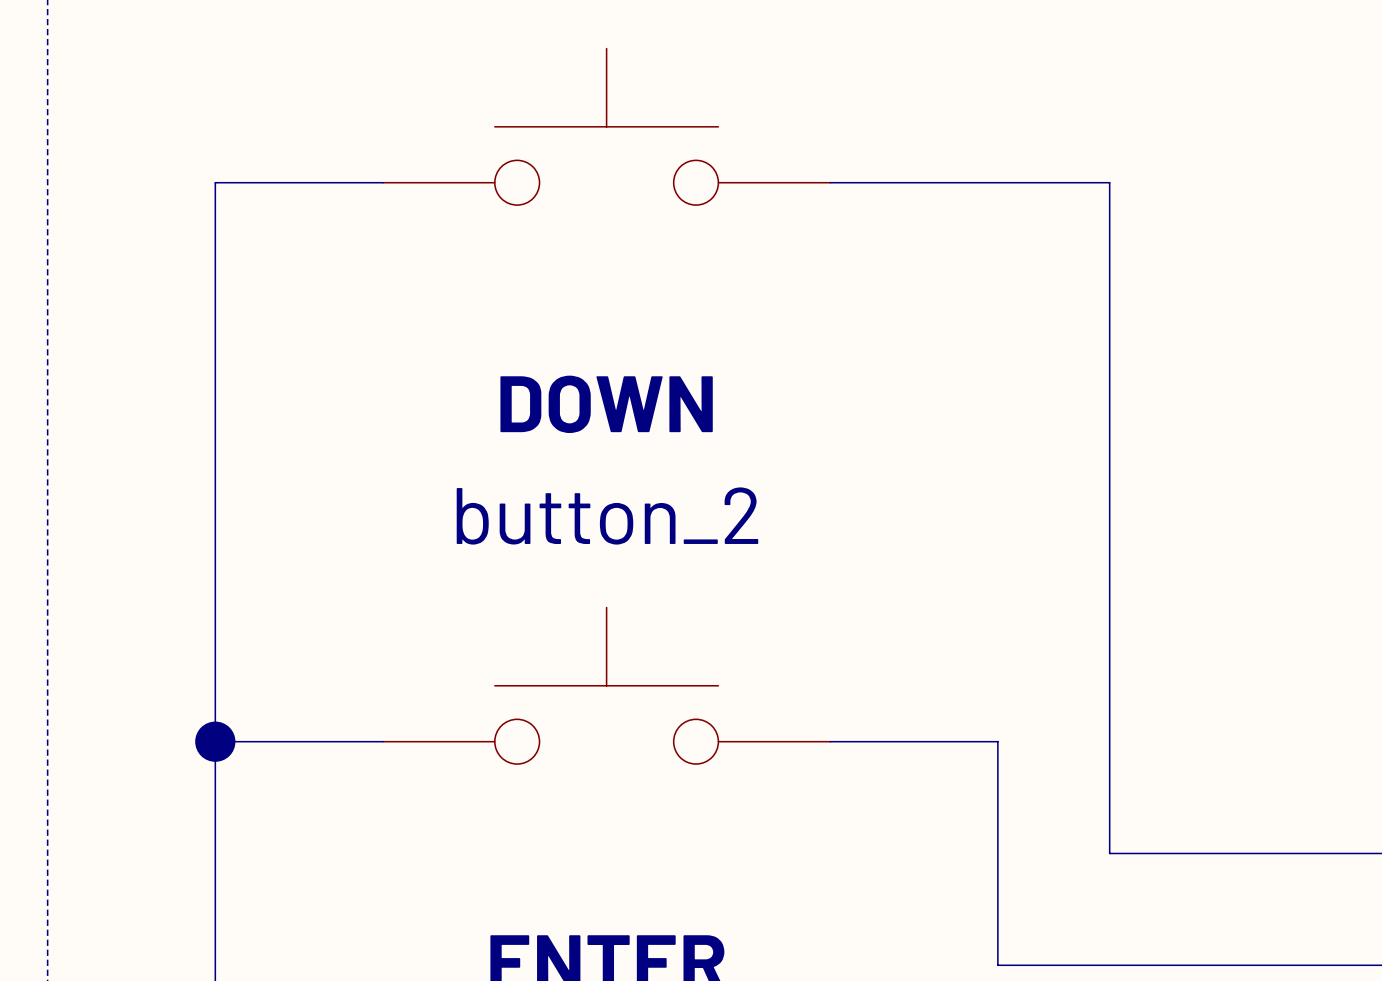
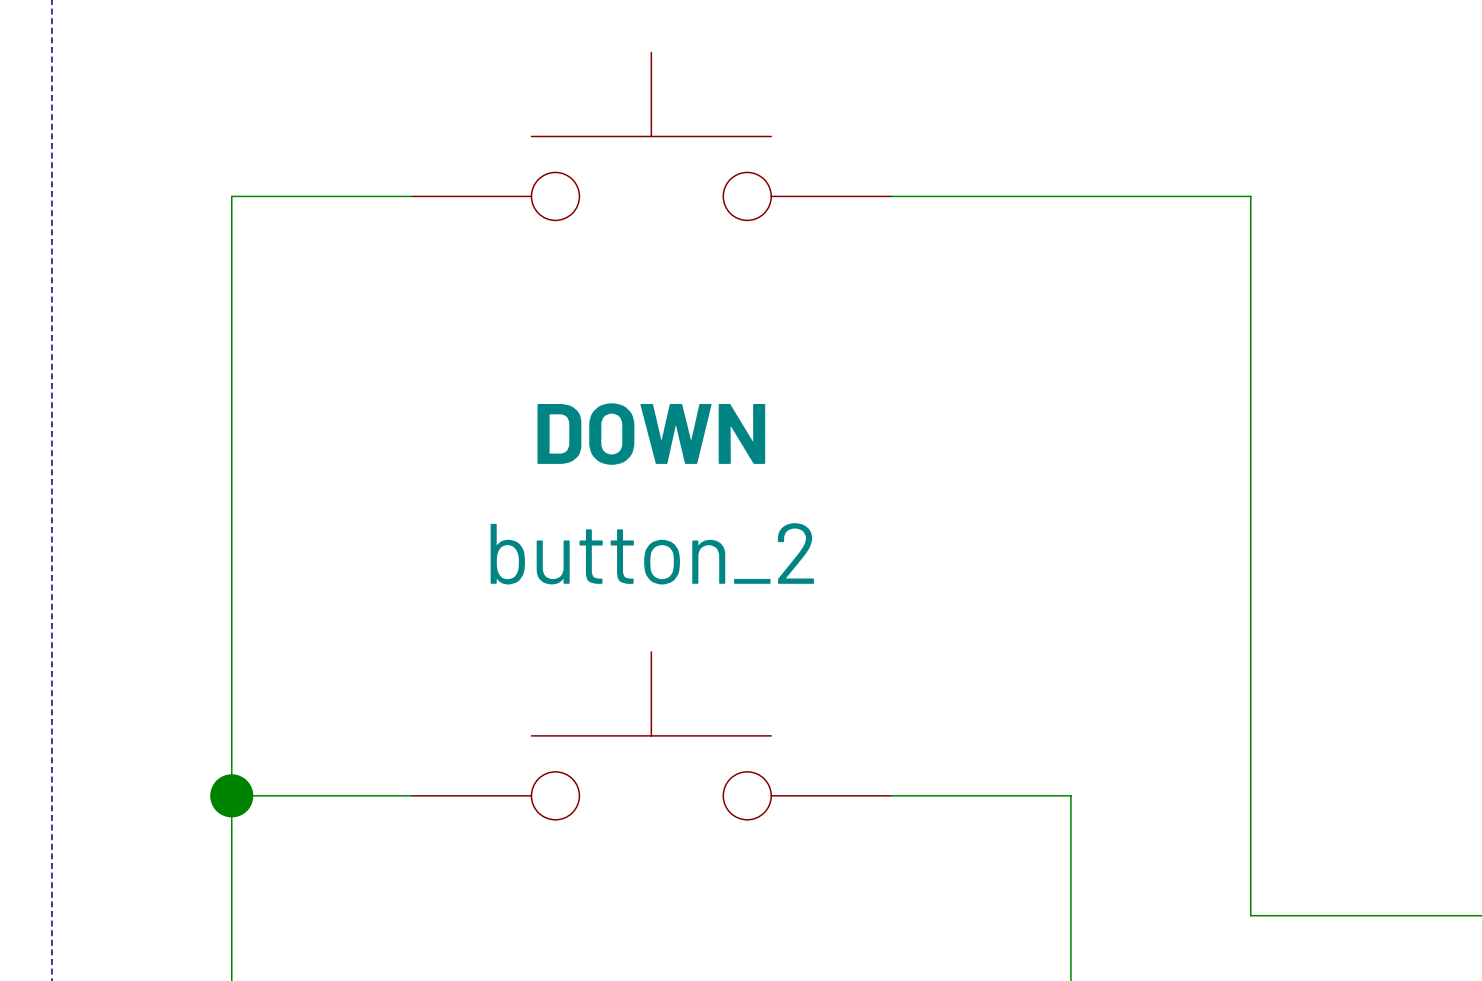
wire: (1109, 182) (1109, 853) (1165, 853) -> (1190, 196) (1250, 196) (1250, 915)

